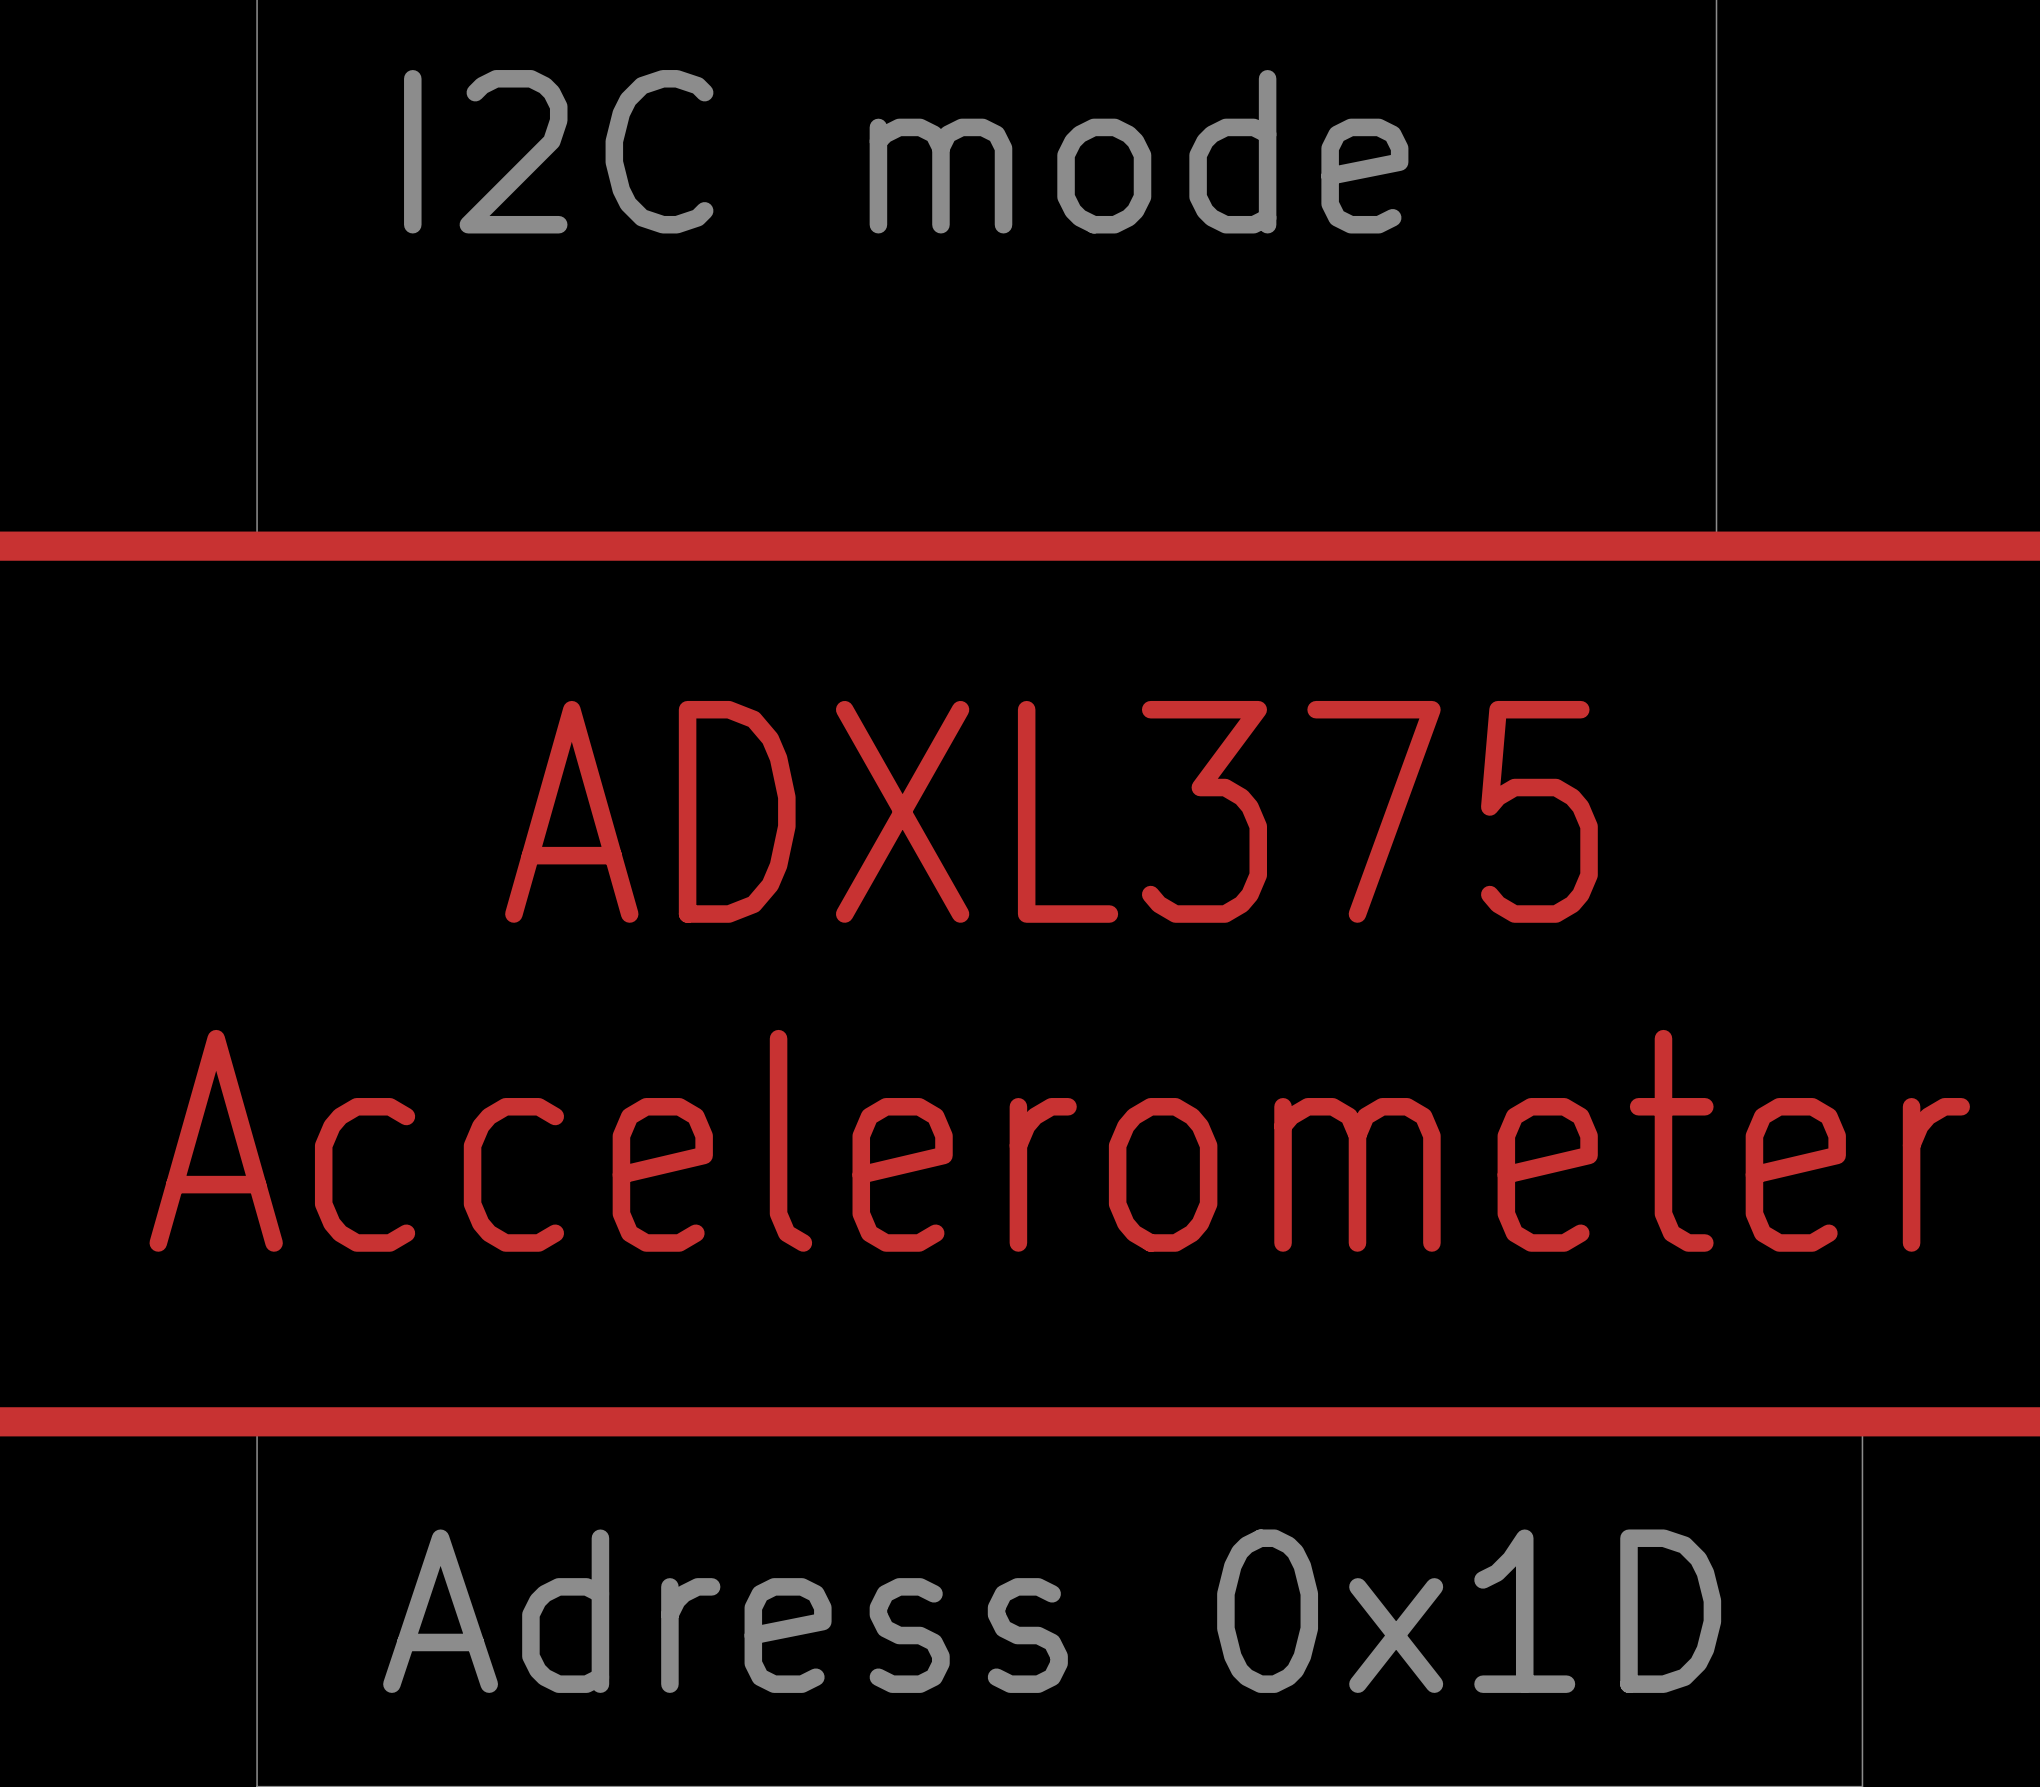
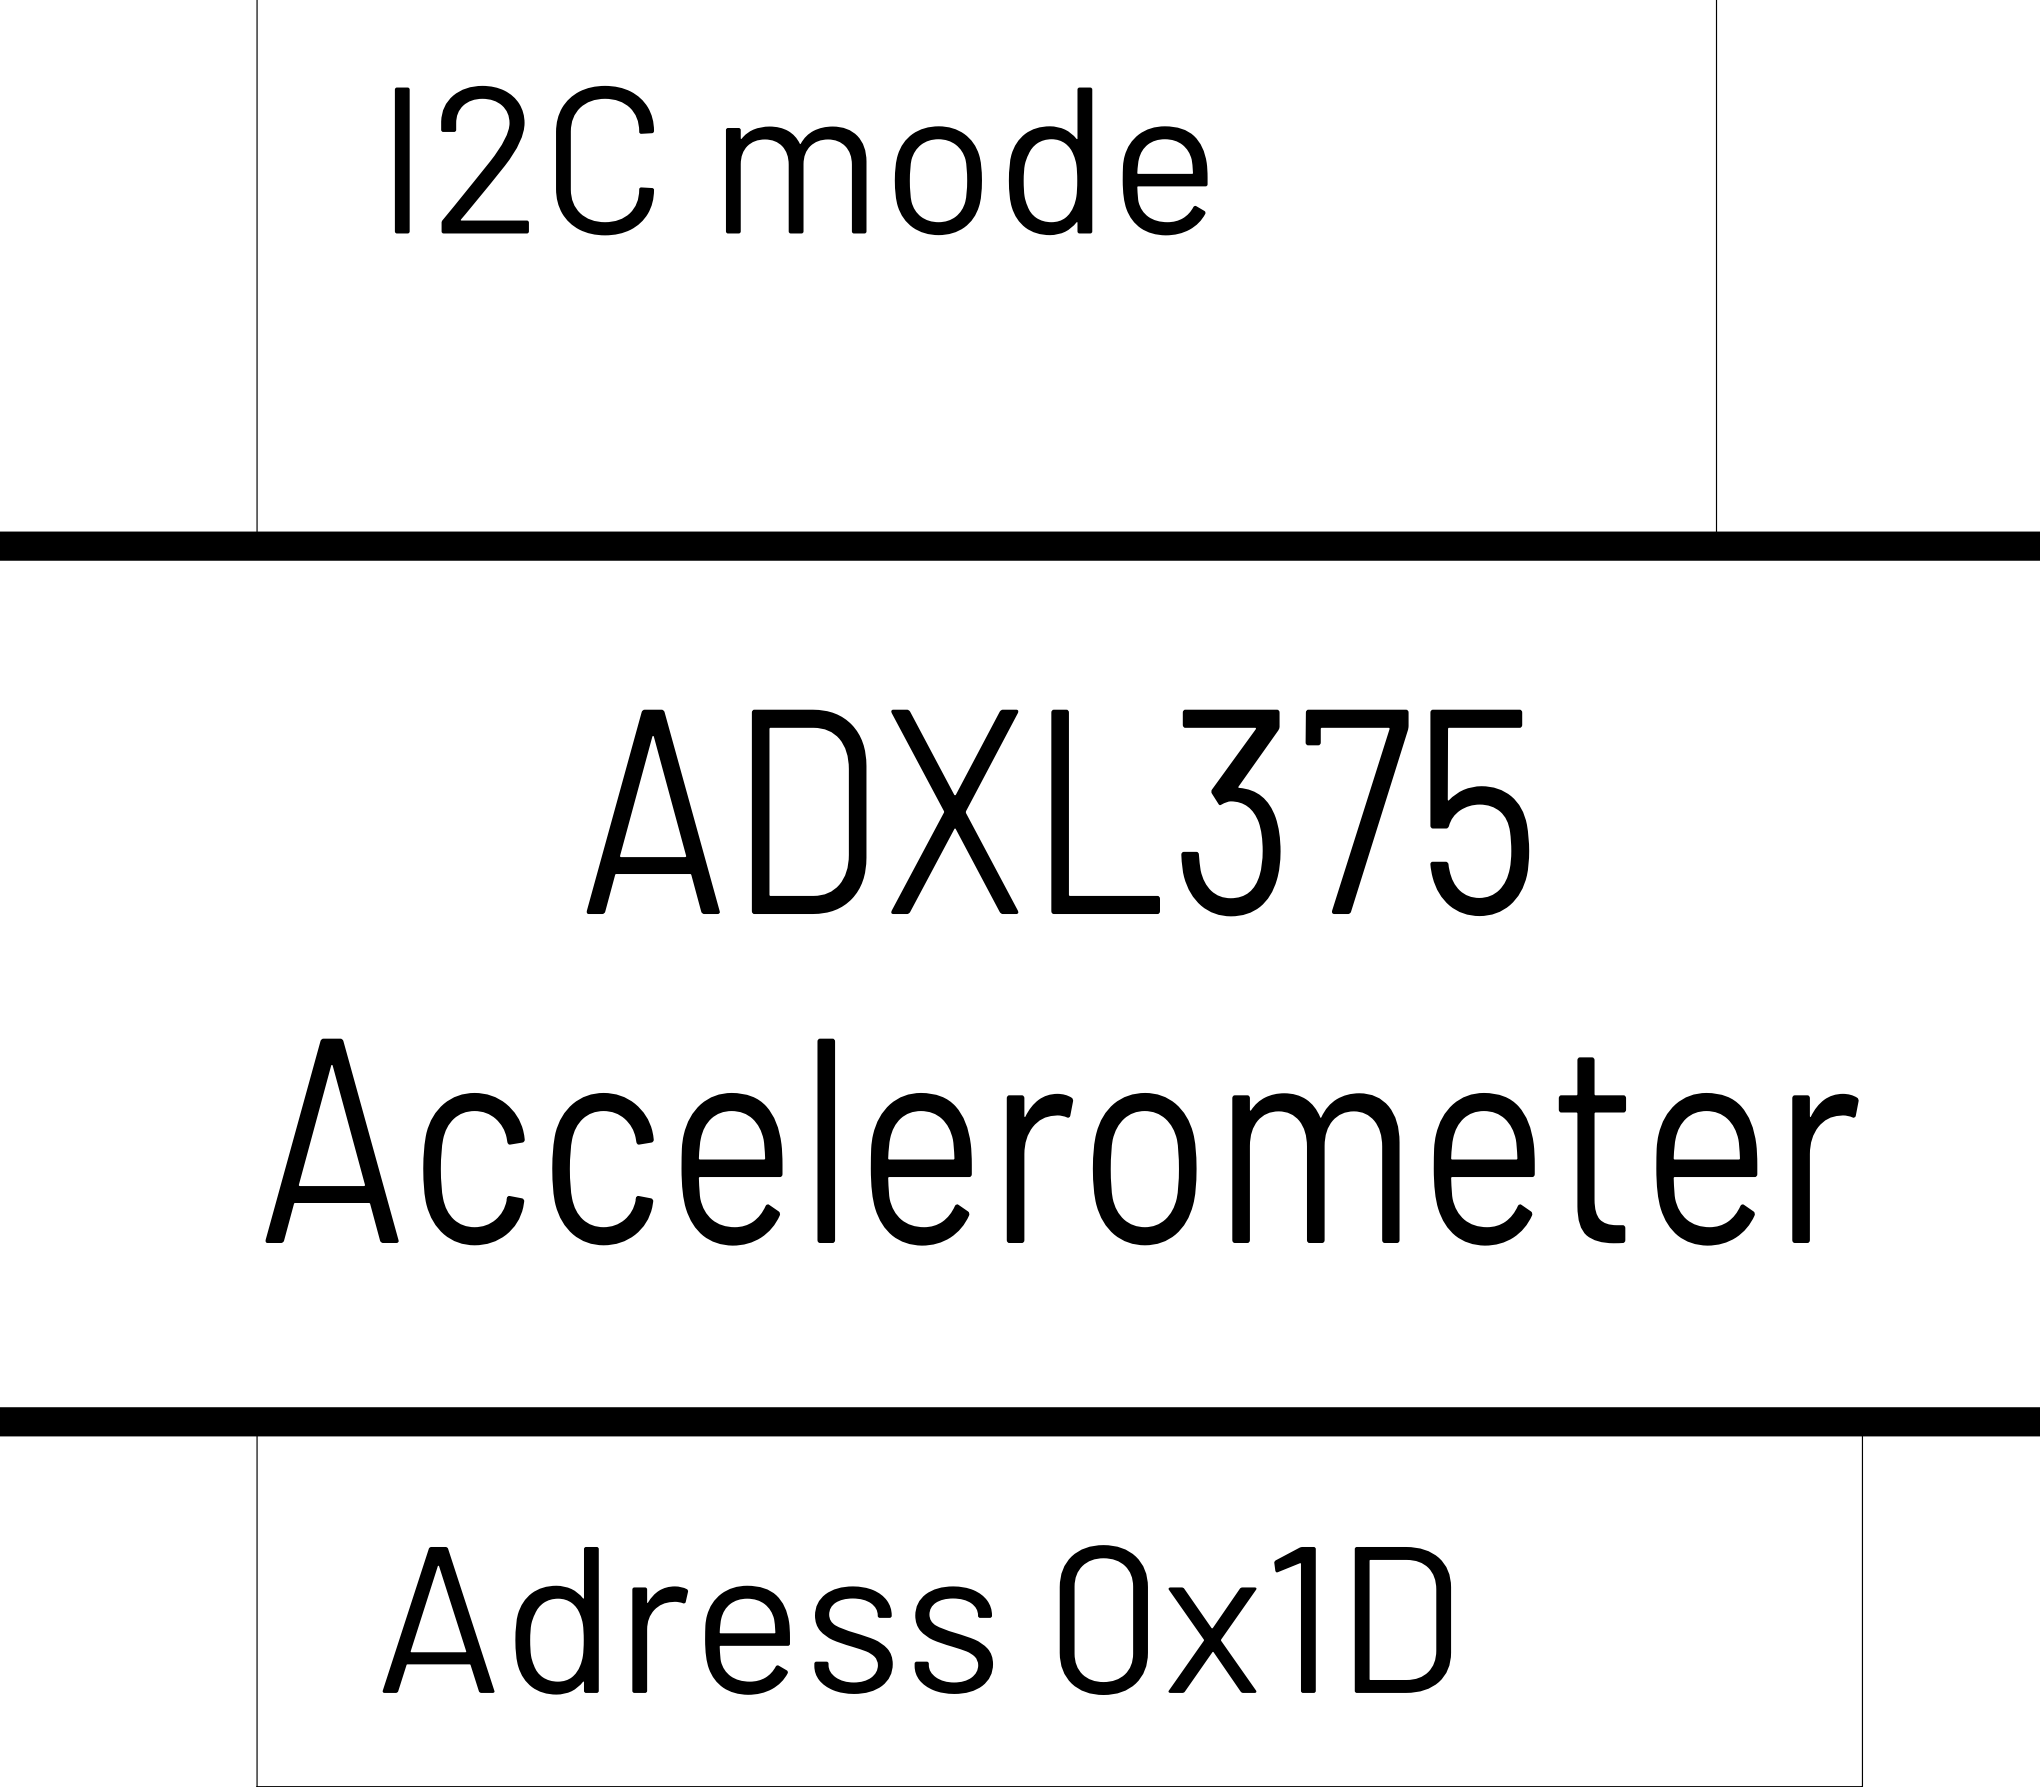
text position: I2C mode (906, 151) -> I2C mode (801, 160)
text position: Adress 0x1D (1052, 1611) -> Adress 0x1D (916, 1620)

